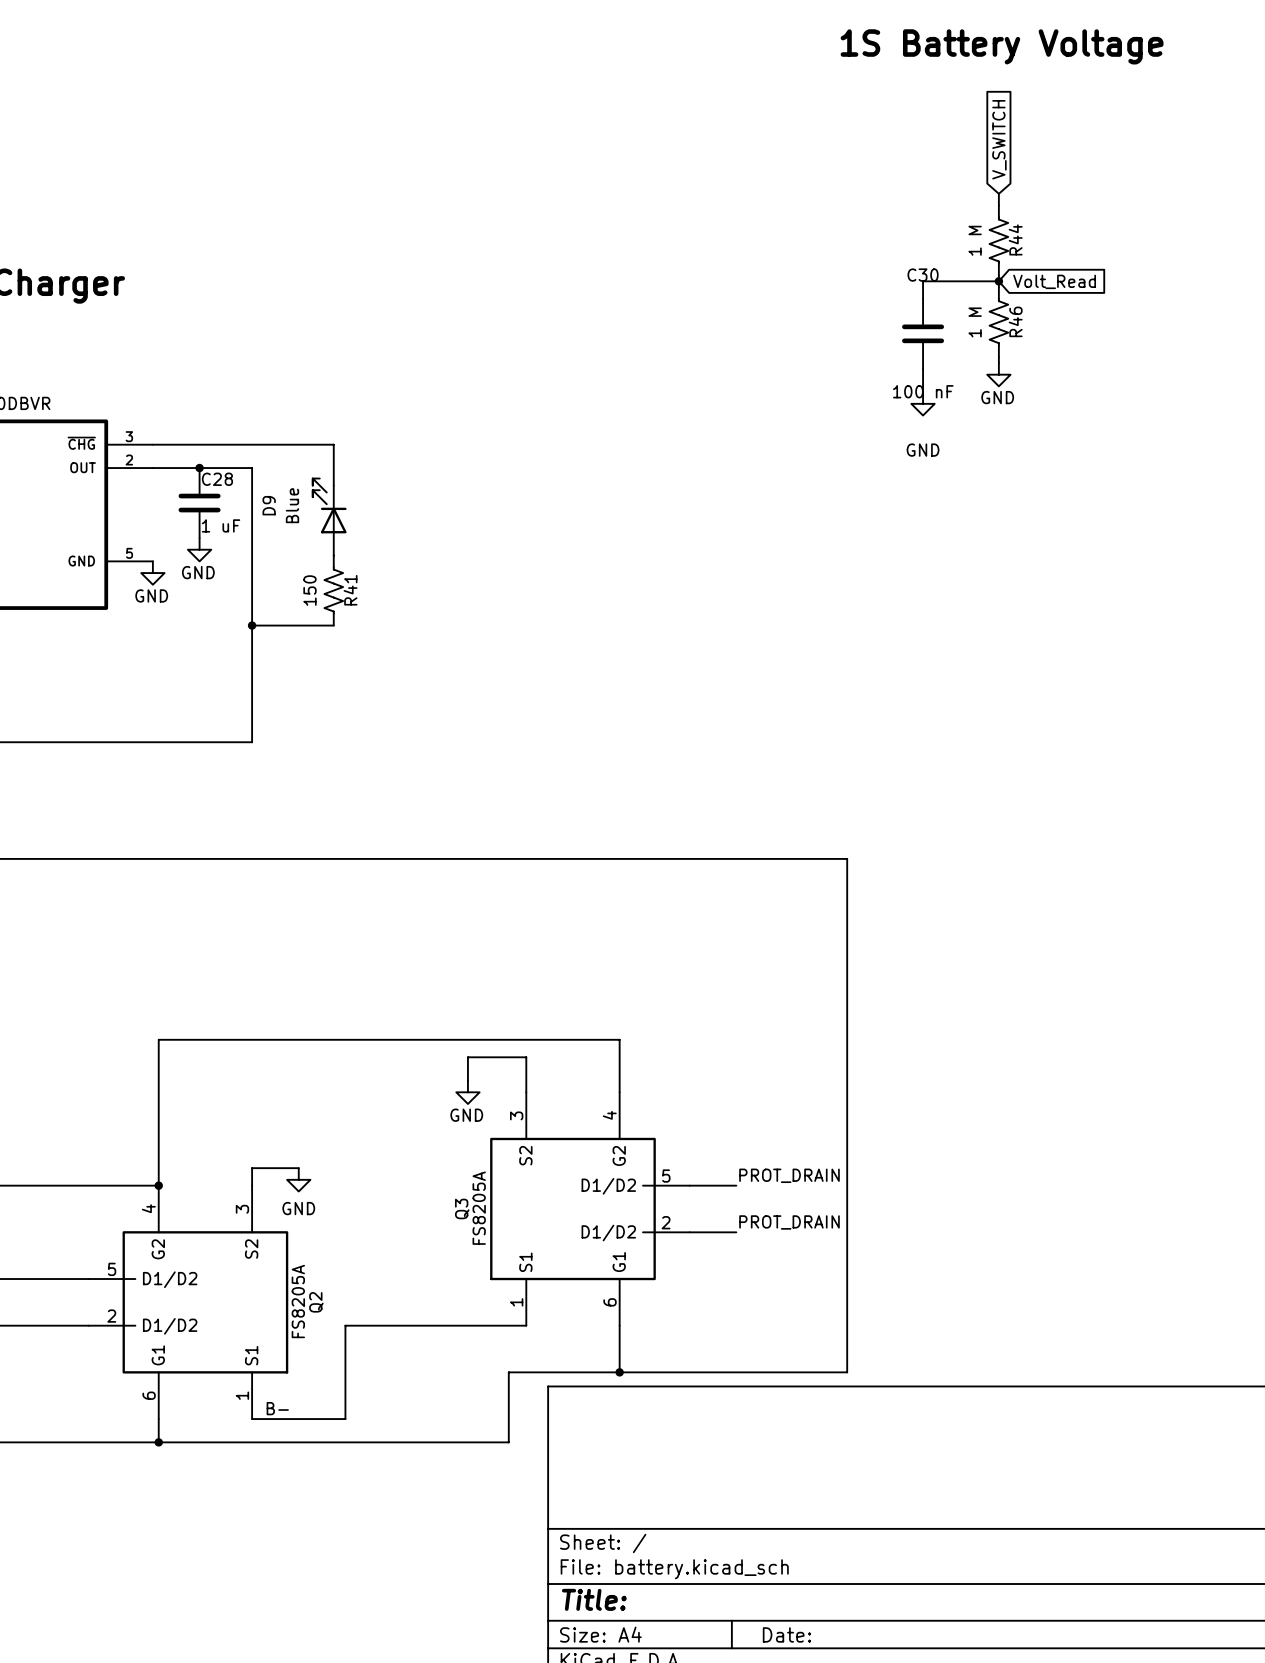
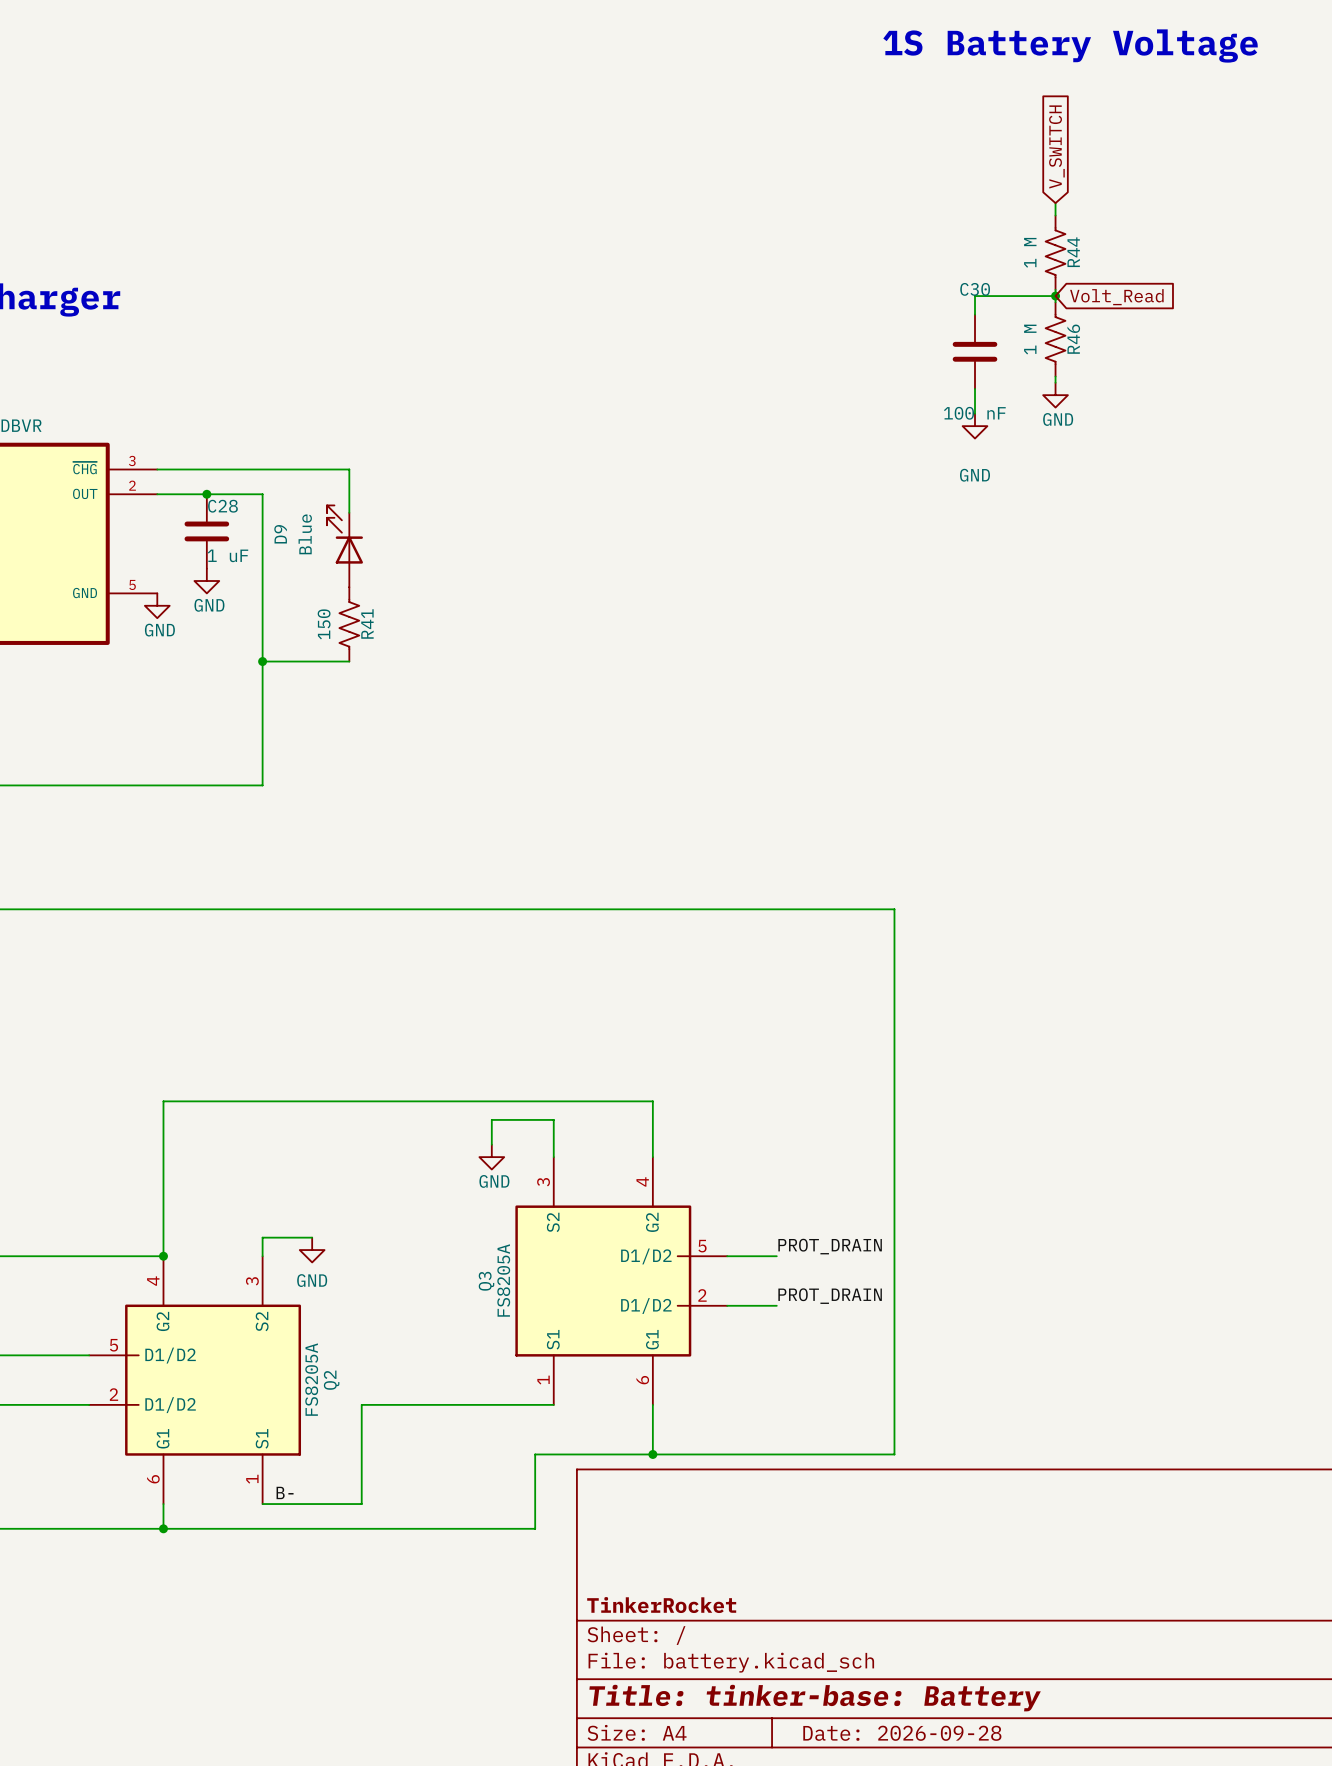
title block: none -> TinkerRocket (661, 1605)
title block: Title: (594, 1599) -> Title: tinker-base: Battery (815, 1698)
title block: Date: (786, 1634) -> Date: 2026-09-28 (902, 1733)

